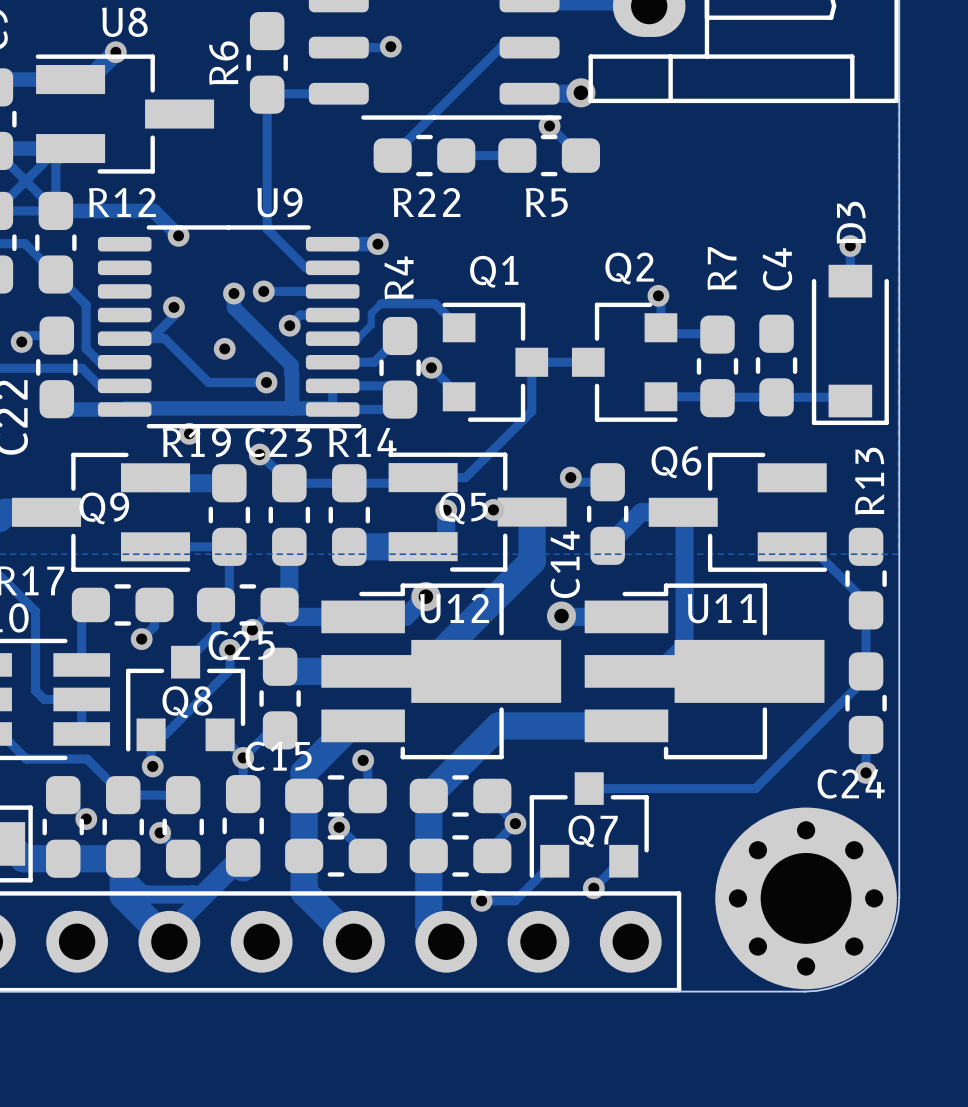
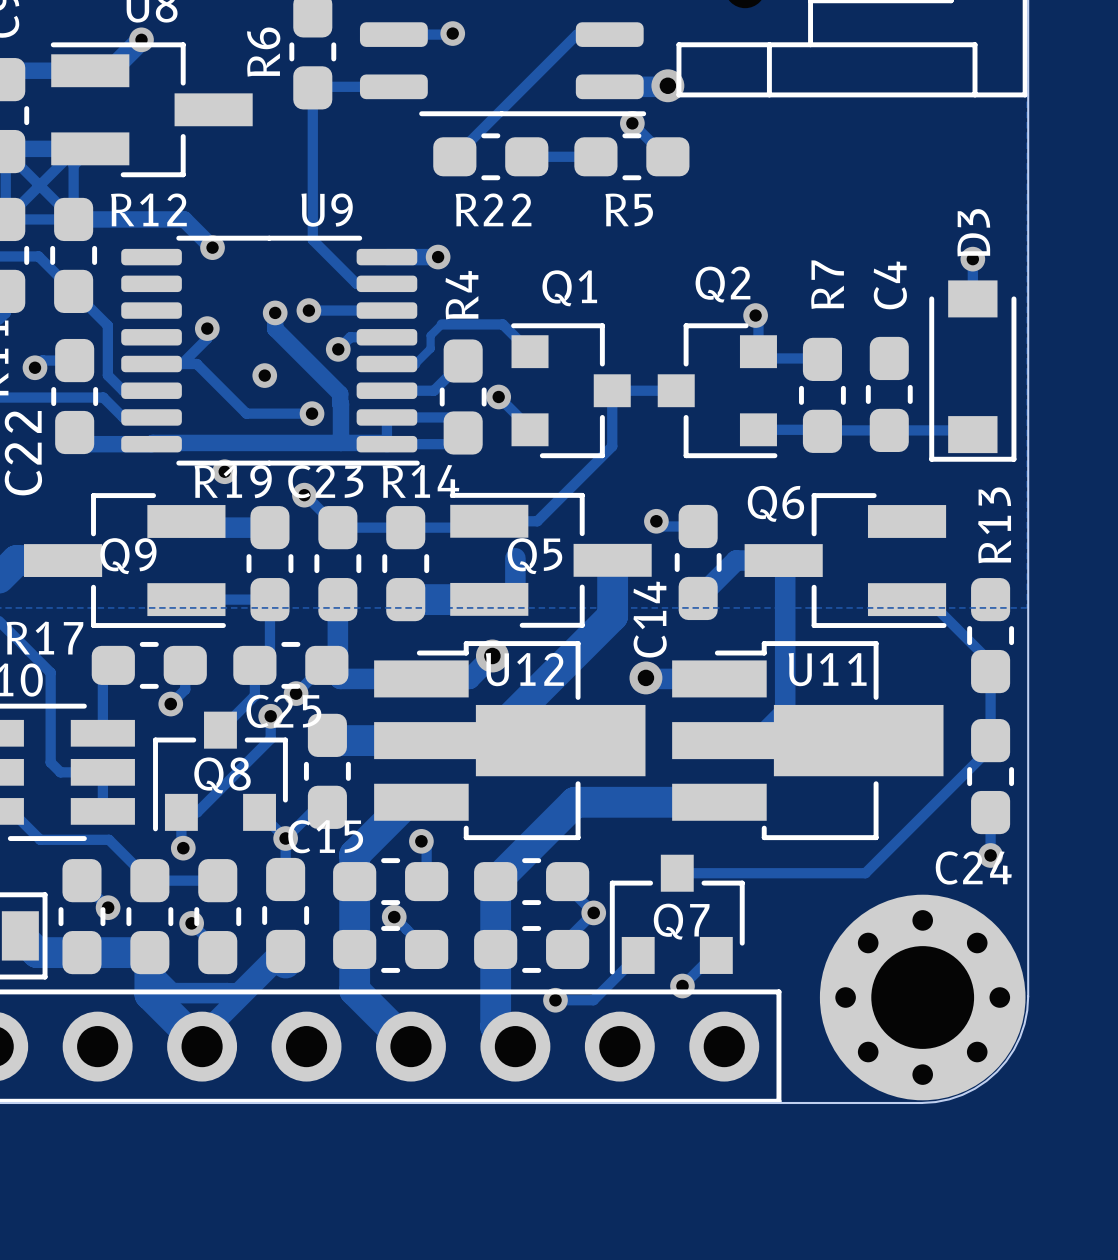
via: (493, 509) -> none
via: (446, 510) -> none

